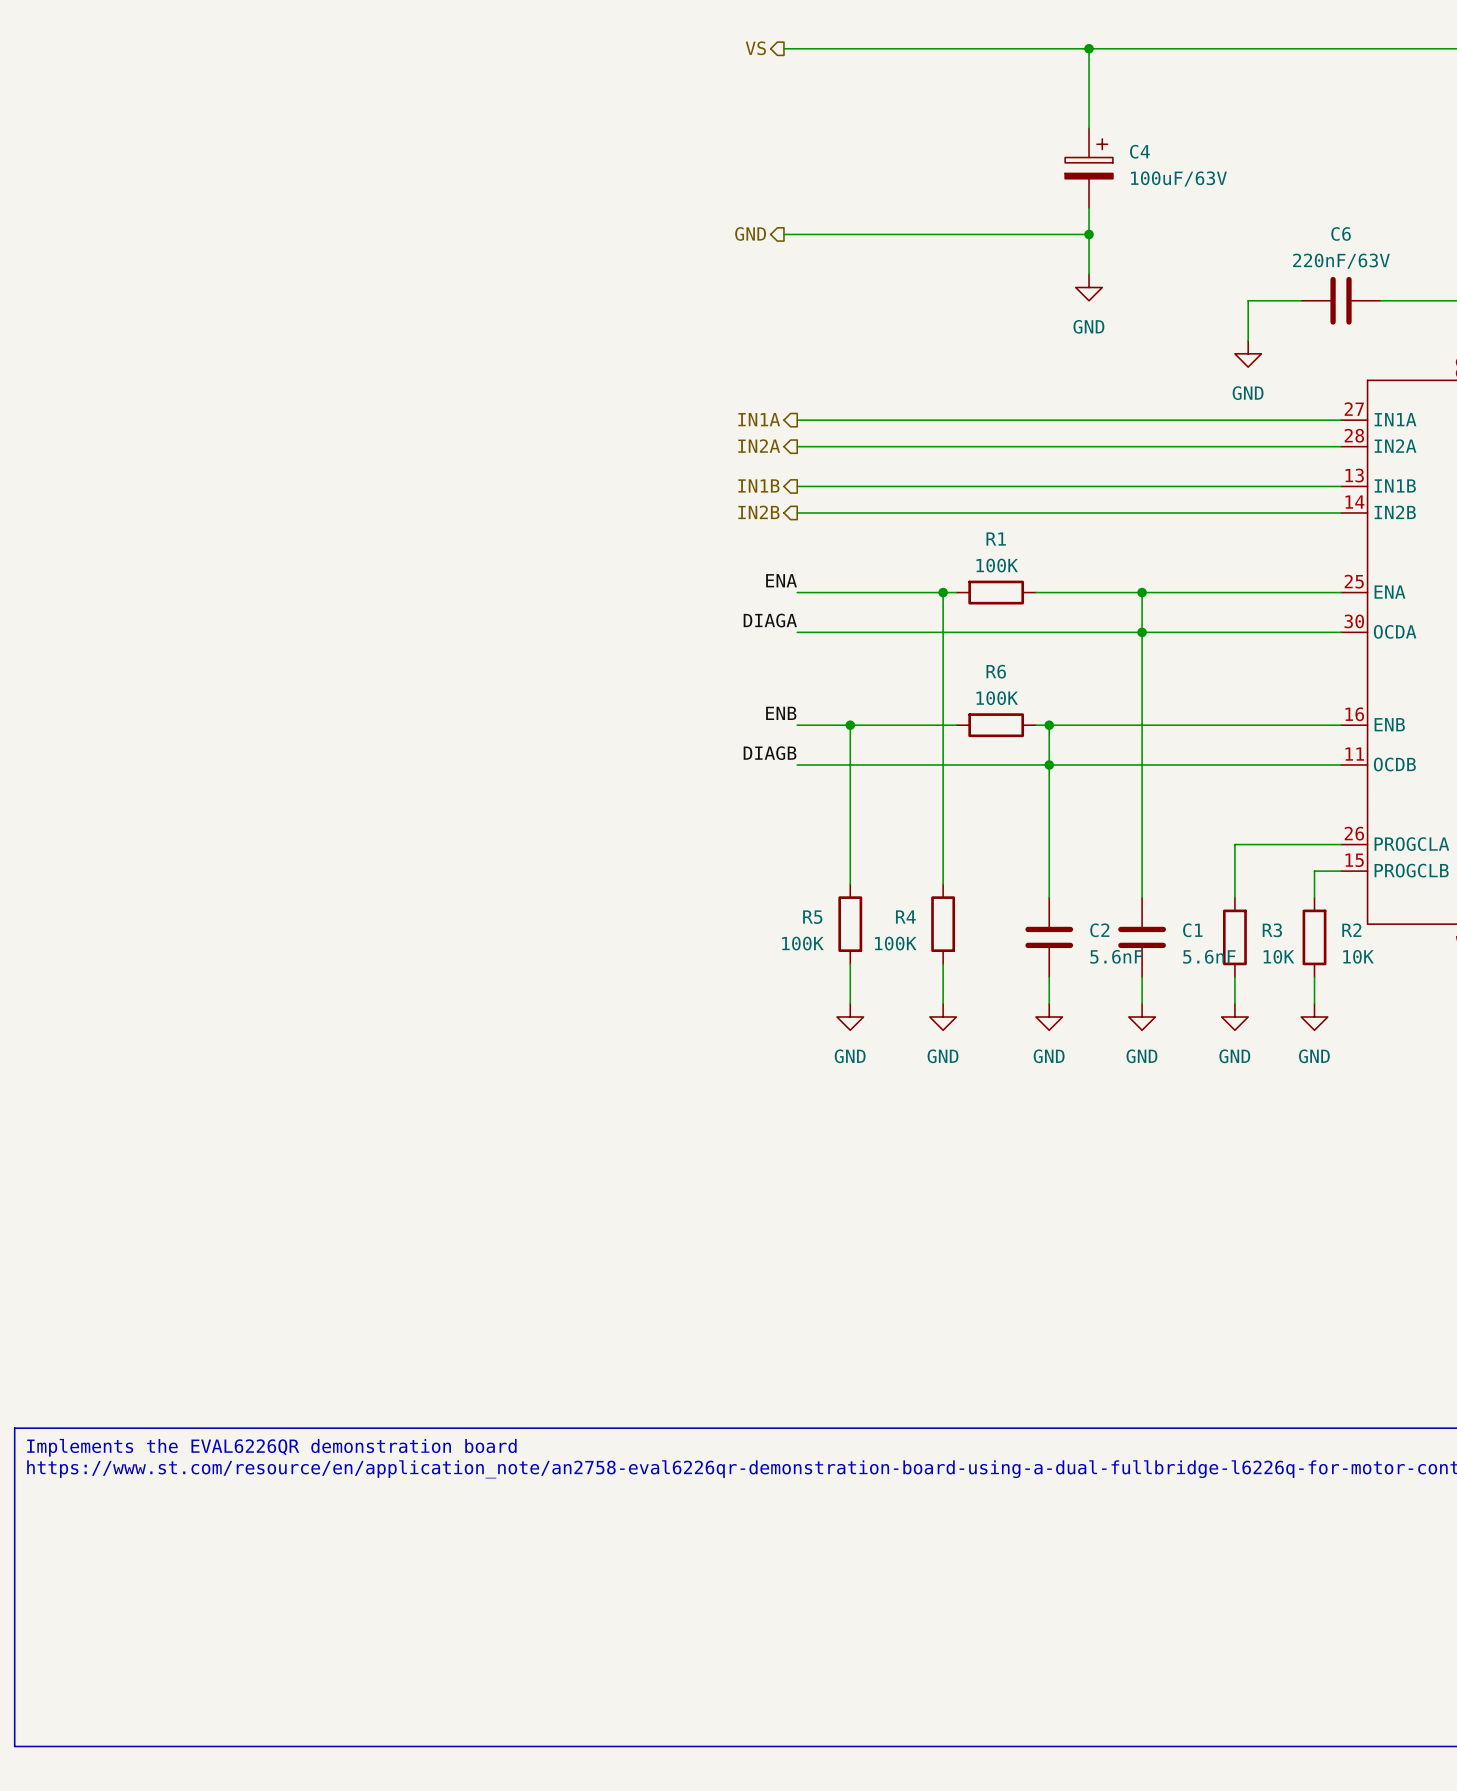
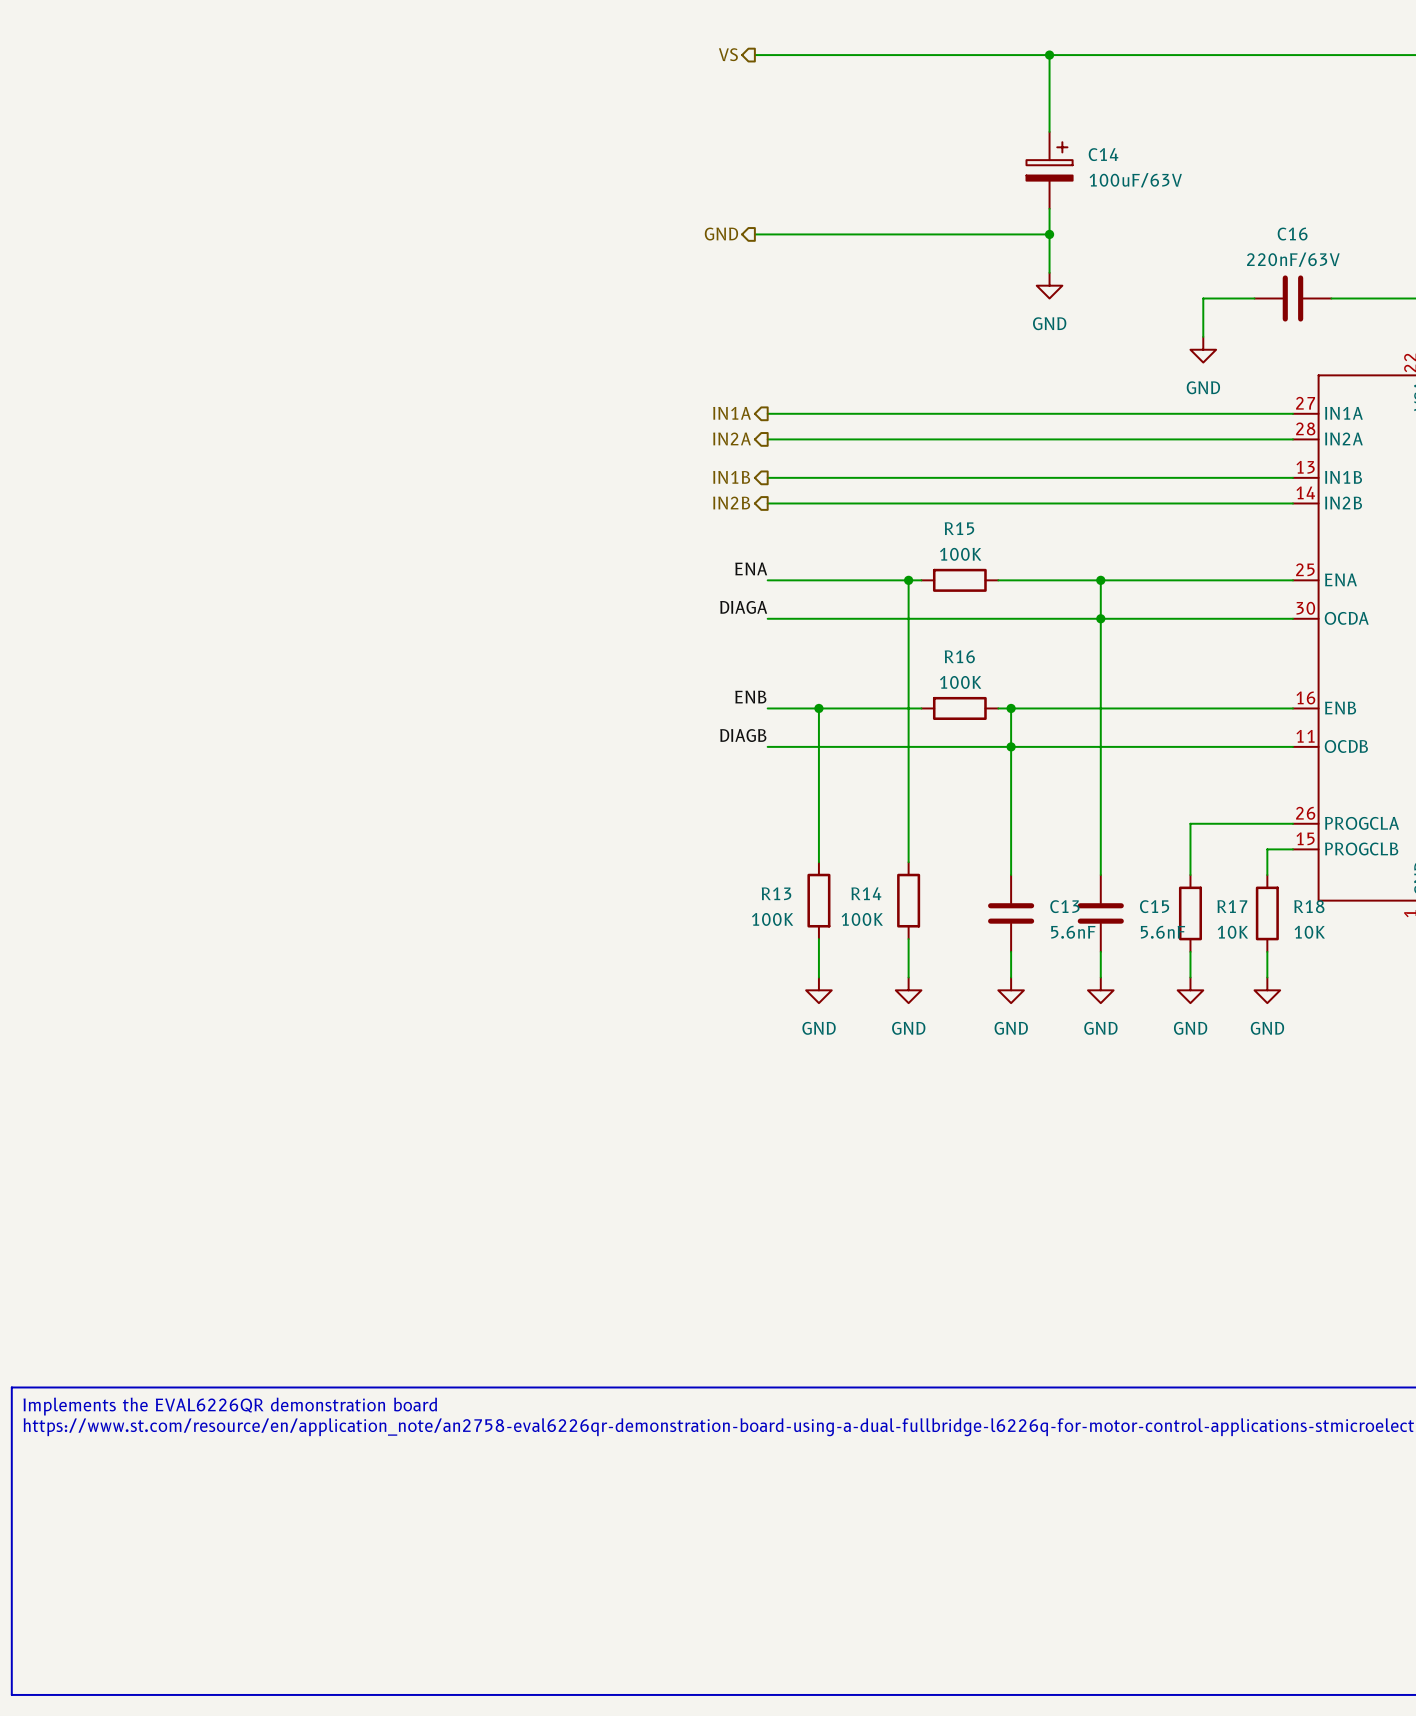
C4 name: C4 (1139, 151) -> C14 (1103, 154)
C6 name: C6 (1341, 233) -> C16 (1292, 234)
R1 name: R1 (996, 539) -> R15 (959, 528)
R6 name: R6 (996, 671) -> R16 (959, 656)
R5 name: R5 (812, 917) -> R13 (776, 893)
R4 name: R4 (905, 917) -> R14 (866, 893)
C2 name: C2 (1099, 930) -> C13 (1064, 906)
C1 name: C1 (1192, 930) -> C15 (1154, 906)
R3 name: R3 (1272, 930) -> R17 (1232, 906)
R2 name: R2 (1351, 930) -> R18 (1309, 906)

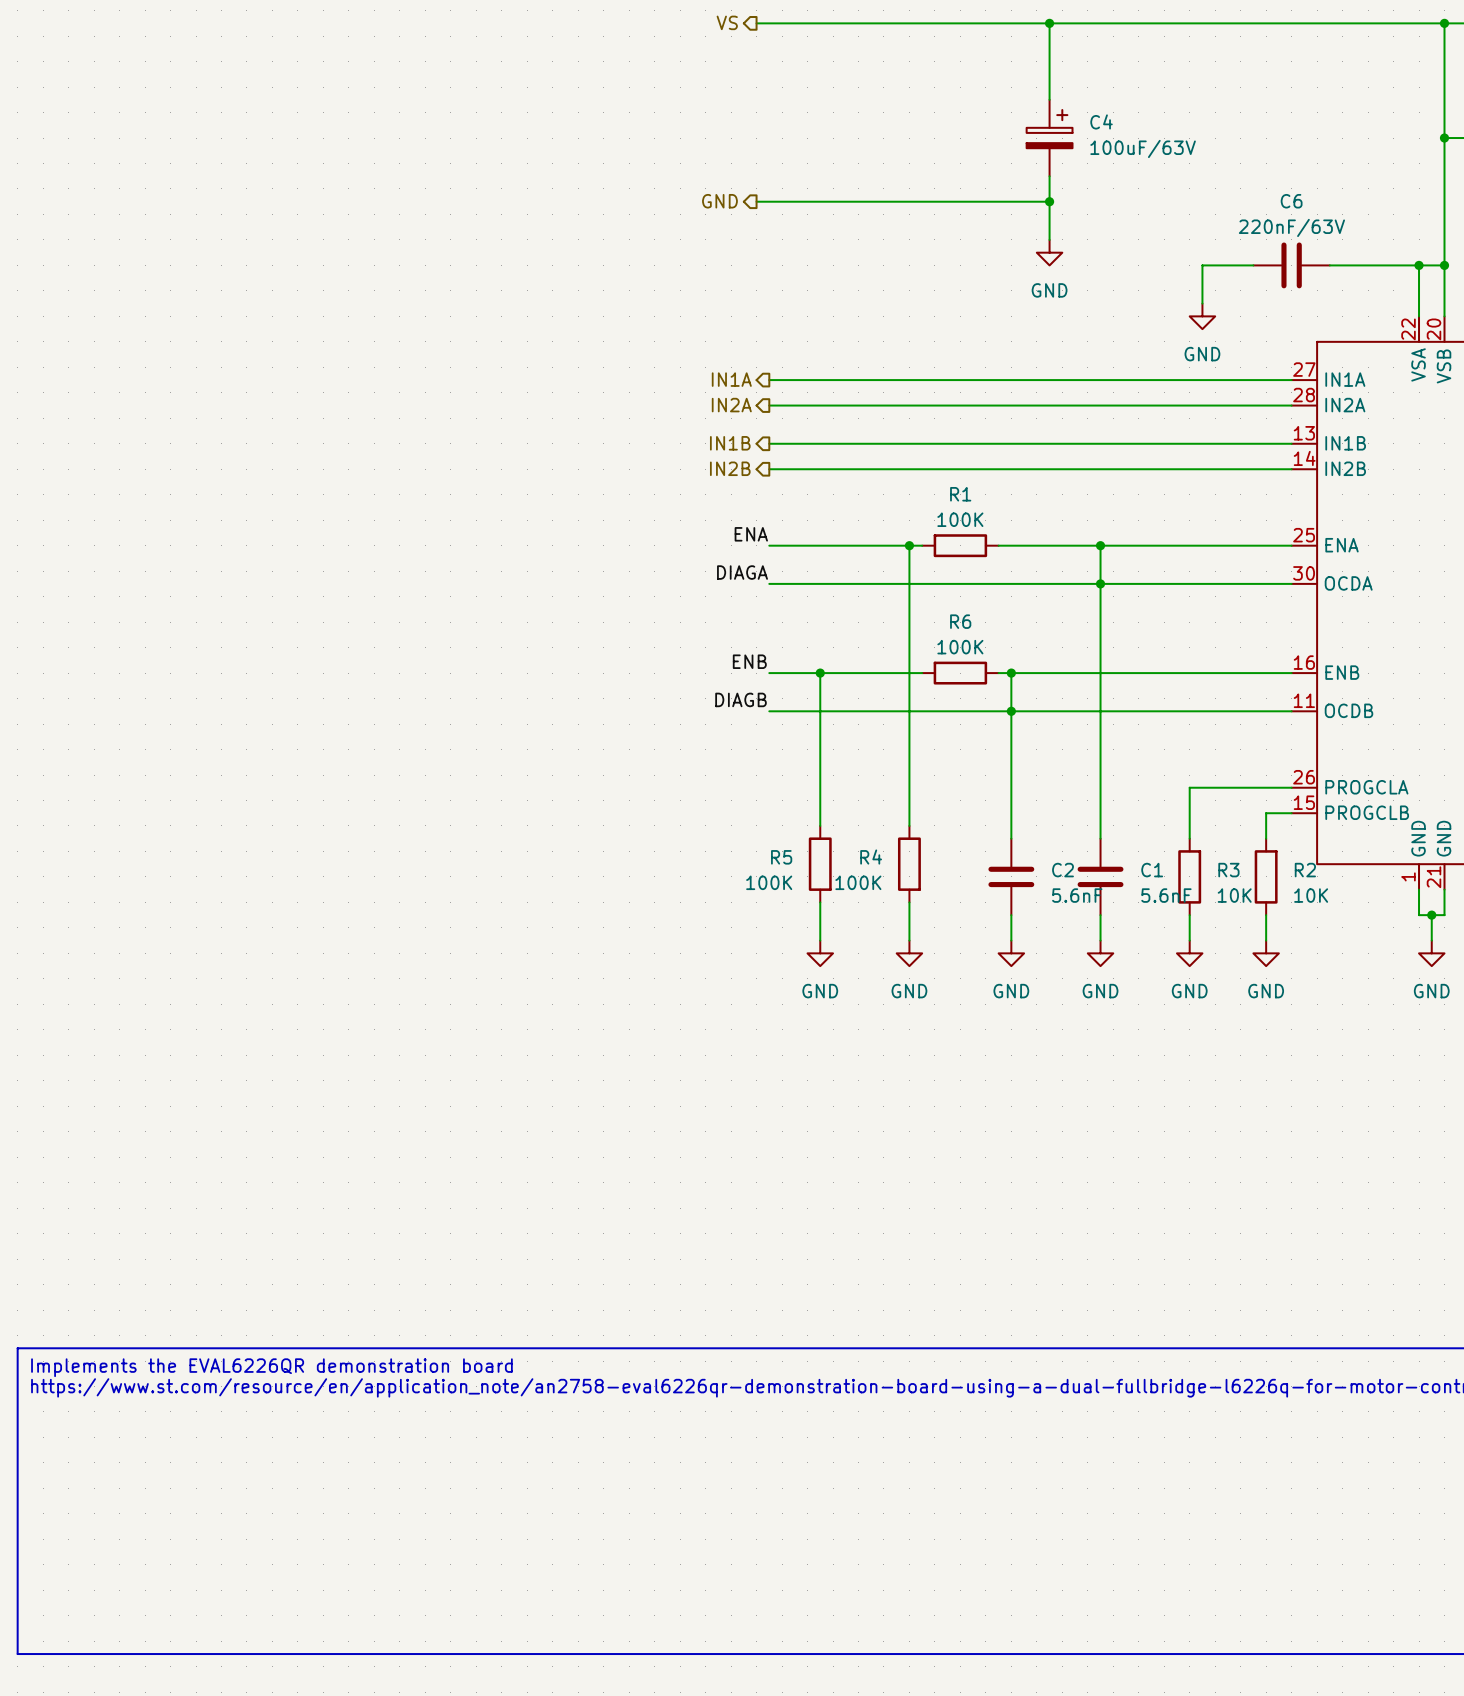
C14 name: C14 (1103, 154) -> C4 (1101, 121)
C16 name: C16 (1292, 234) -> C6 (1291, 201)
R15 name: R15 (959, 528) -> R1 (960, 494)
R16 name: R16 (959, 656) -> R6 (960, 621)
R13 name: R13 (776, 893) -> R5 (781, 857)
R14 name: R14 (866, 893) -> R4 (871, 857)
C13 name: C13 (1064, 906) -> C2 (1063, 870)
C15 name: C15 (1154, 906) -> C1 (1152, 870)
R17 name: R17 (1232, 906) -> R3 (1228, 870)
R18 name: R18 (1309, 906) -> R2 (1305, 870)

